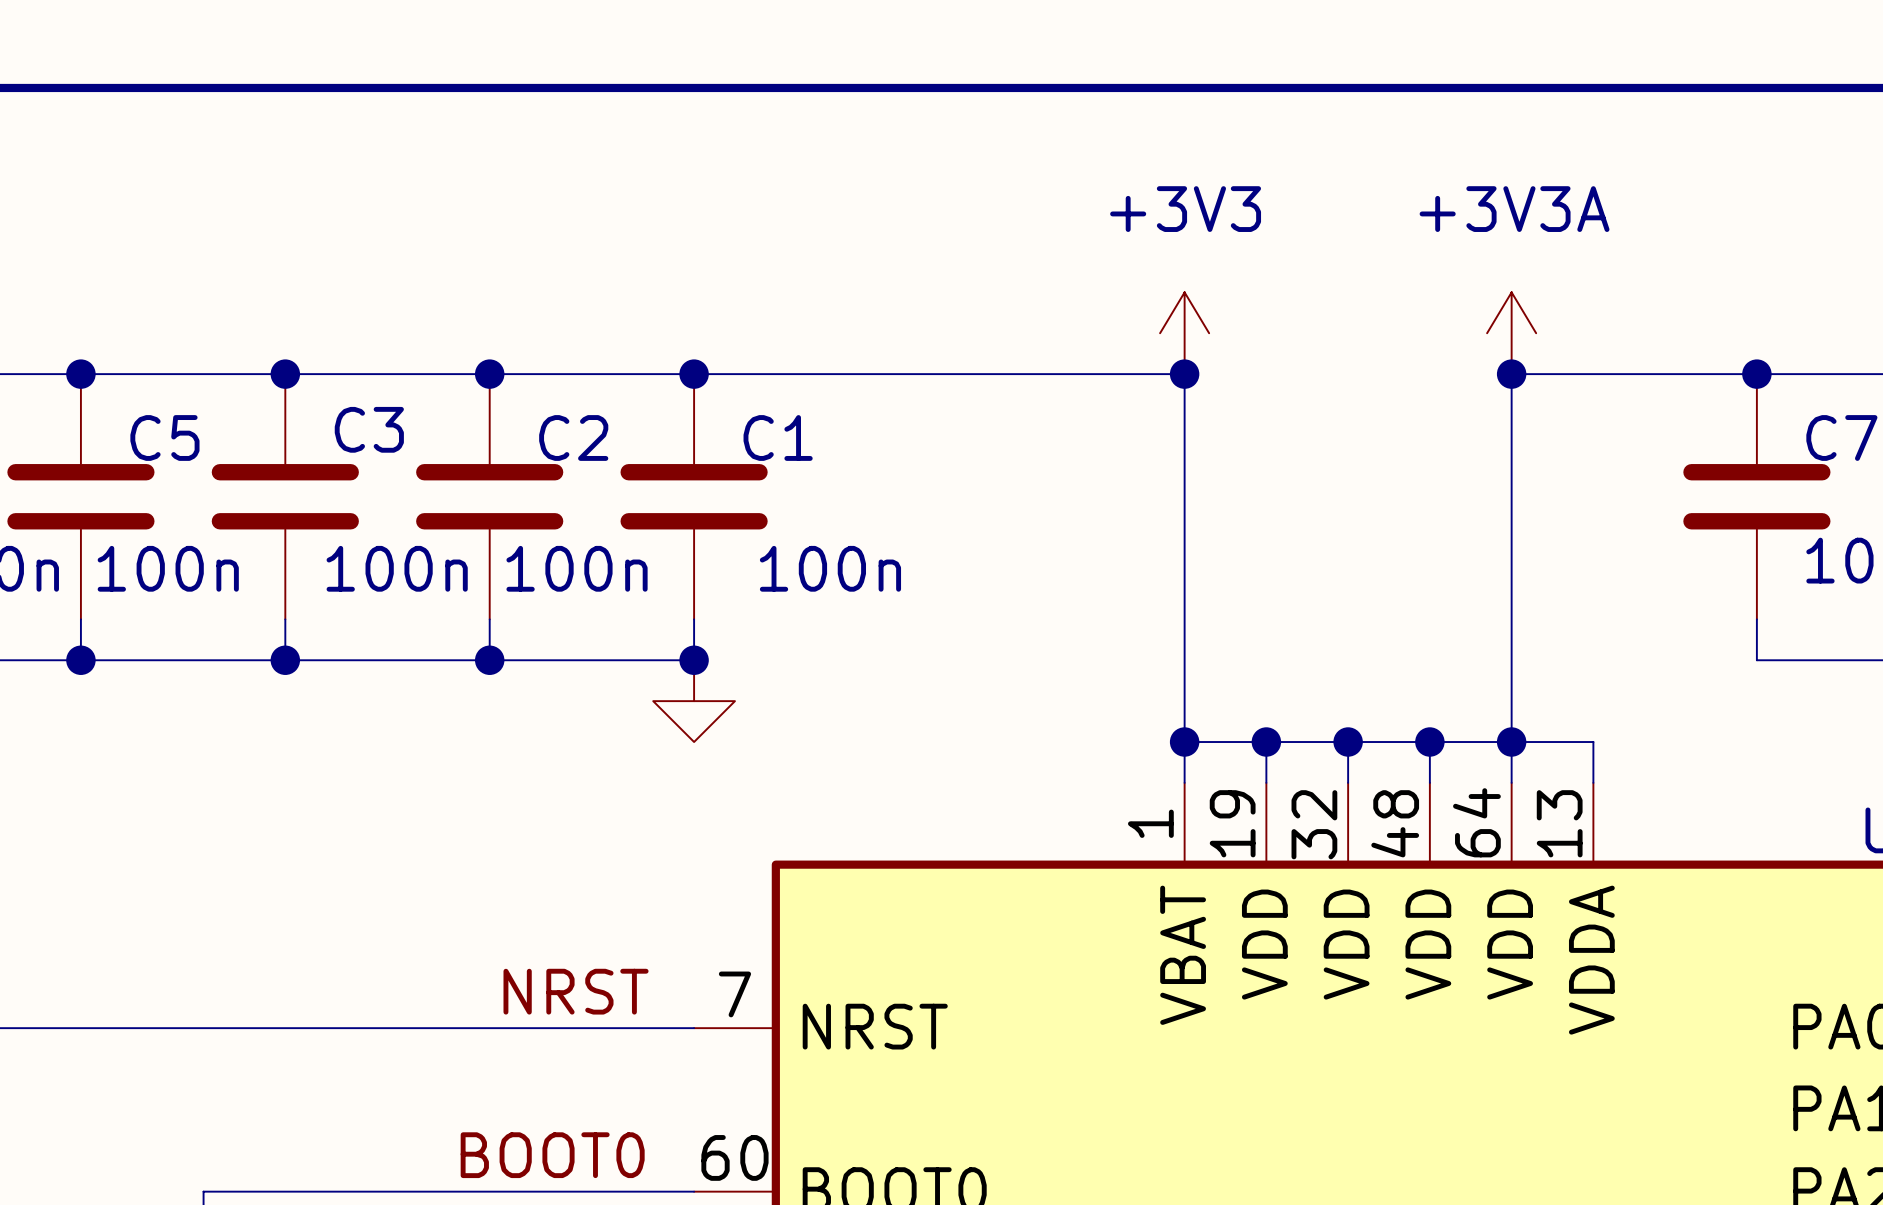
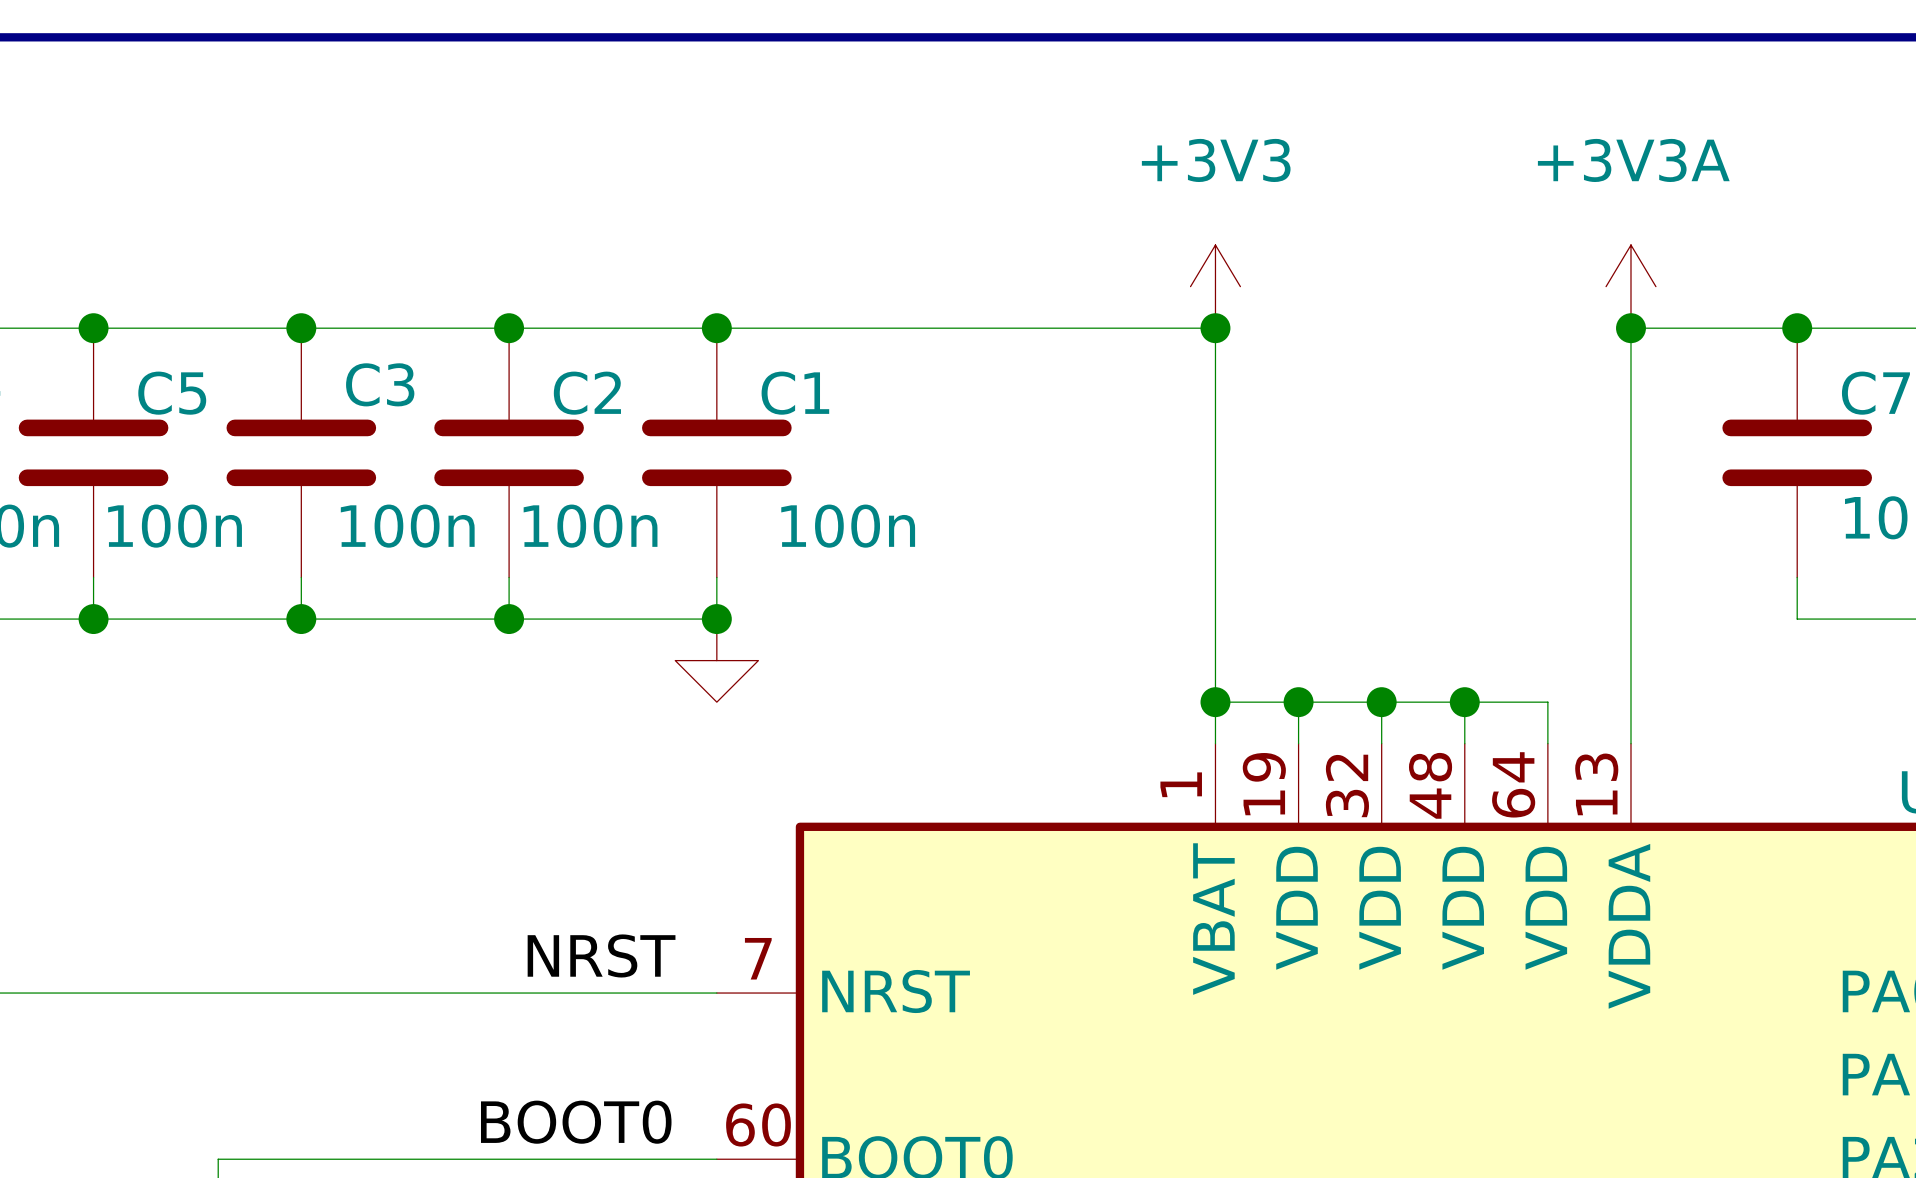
power symbol position: +3V3A (1511, 333) -> +3V3A (1630, 286)
junction position: (1511, 374) -> (1630, 328)
wire: (1593, 374) (1511, 374) (1511, 742) (1593, 742) -> (1630, 328) (1630, 702)
junction: (1511, 742) -> none

